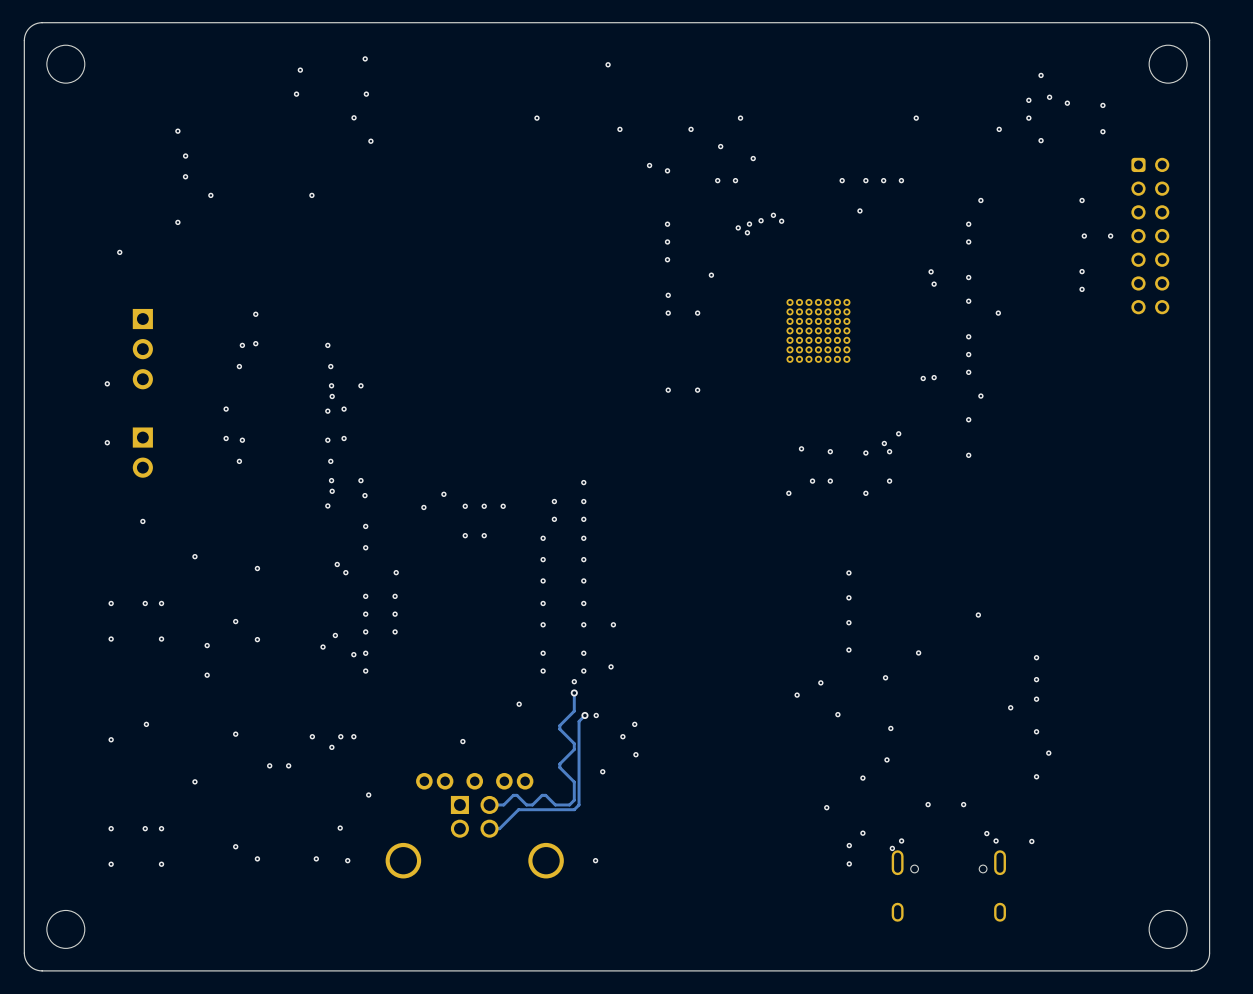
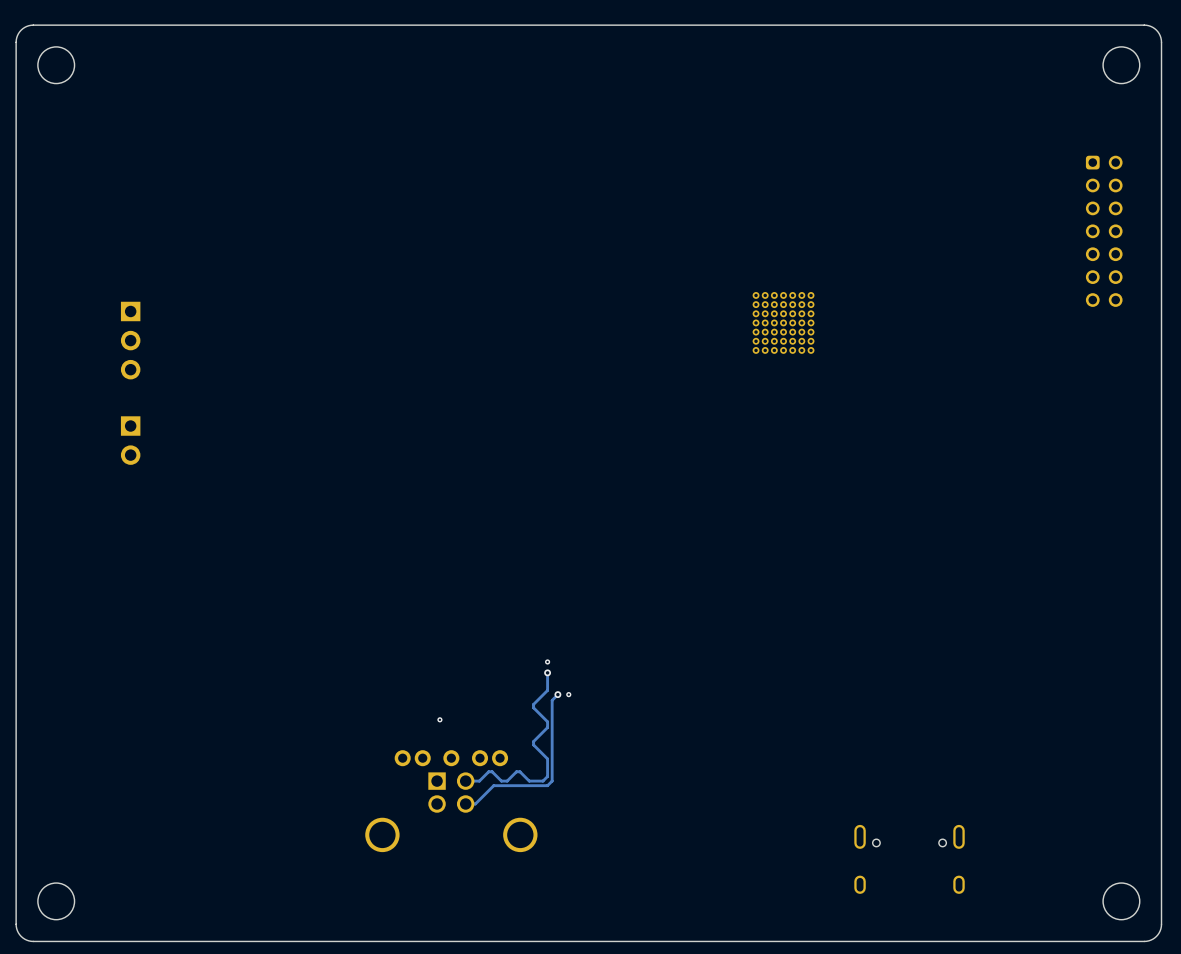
via: (365, 58) -> none
via: (608, 64) -> none
via: (300, 70) -> none
via: (1041, 75) -> none
via: (296, 94) -> none
via: (366, 94) -> none
via: (1049, 97) -> none
via: (1028, 100) -> none
via: (1067, 103) -> none
via: (1102, 105) -> none
via: (354, 117) -> none
via: (536, 118) -> none
via: (740, 118) -> none
via: (916, 118) -> none
via: (1028, 118) -> none
via: (619, 129) -> none
via: (691, 129) -> none
via: (999, 129) -> none
via: (177, 131) -> none
via: (1102, 131) -> none
via: (1041, 140) -> none
via: (370, 141) -> none
via: (720, 146) -> none
via: (185, 156) -> none
via: (753, 158) -> none
via: (649, 165) -> none
via: (667, 170) -> none
via: (185, 176) -> none
via: (717, 180) -> none
via: (735, 180) -> none
via: (842, 180) -> none
via: (865, 180) -> none
via: (883, 180) -> none
via: (901, 180) -> none
via: (210, 195) -> none
via: (311, 195) -> none
via: (980, 200) -> none
via: (1082, 200) -> none
via: (859, 210) -> none
via: (773, 215) -> none
via: (761, 220) -> none
via: (781, 221) -> none
via: (177, 222) -> none
via: (667, 224) -> none
via: (749, 224) -> none
via: (968, 224) -> none
via: (738, 227) -> none
via: (747, 232) -> none
via: (1084, 236) -> none
via: (1110, 236) -> none
via: (667, 241) -> none
via: (968, 241) -> none
via: (119, 252) -> none
via: (667, 259) -> none
via: (931, 271) -> none
via: (1082, 271) -> none
via: (711, 275) -> none
via: (968, 277) -> none
via: (934, 284) -> none
via: (1082, 289) -> none
via: (668, 295) -> none
via: (968, 301) -> none
via: (668, 313) -> none
via: (697, 313) -> none
via: (998, 313) -> none
via: (255, 314) -> none
via: (968, 336) -> none
via: (255, 343) -> none
via: (242, 345) -> none
via: (327, 345) -> none
via: (968, 354) -> none
via: (239, 366) -> none
via: (330, 366) -> none
via: (968, 372) -> none
via: (934, 377) -> none
via: (923, 378) -> none
via: (107, 383) -> none
via: (331, 385) -> none
via: (360, 385) -> none
via: (668, 390) -> none
via: (697, 390) -> none
via: (332, 396) -> none
via: (980, 396) -> none
via: (226, 409) -> none
via: (344, 409) -> none
via: (327, 411) -> none
via: (968, 419) -> none
via: (898, 433) -> none
via: (226, 438) -> none
via: (344, 438) -> none
via: (242, 440) -> none
via: (327, 440) -> none
via: (107, 442) -> none
via: (884, 443) -> none
via: (801, 448) -> none
via: (830, 451) -> none
via: (889, 451) -> none
via: (865, 453) -> none
via: (968, 455) -> none
via: (239, 461) -> none
via: (330, 461) -> none
via: (331, 480) -> none
via: (360, 480) -> none
via: (812, 481) -> none
via: (830, 481) -> none
via: (889, 481) -> none
via: (583, 482) -> none
via: (332, 491) -> none
via: (788, 493) -> none
via: (865, 493) -> none
via: (443, 494) -> none
via: (364, 495) -> none
via: (554, 501) -> none
via: (583, 501) -> none
via: (327, 505) -> none
via: (465, 506) -> none
via: (484, 506) -> none
via: (503, 506) -> none
via: (423, 507) -> none
via: (554, 519) -> none
via: (583, 519) -> none
via: (142, 521) -> none
via: (365, 526) -> none
via: (465, 535) -> none
via: (484, 535) -> none
via: (543, 538) -> none
via: (583, 538) -> none
via: (365, 547) -> none
via: (194, 556) -> none
via: (543, 559) -> none
via: (583, 559) -> none
via: (337, 564) -> none
via: (257, 568) -> none
via: (345, 572) -> none
via: (396, 572) -> none
via: (848, 572) -> none
via: (543, 580) -> none
via: (583, 580) -> none
via: (365, 596) -> none
via: (395, 596) -> none
via: (848, 597) -> none
via: (111, 603) -> none
via: (145, 603) -> none
via: (161, 603) -> none
via: (543, 603) -> none
via: (583, 603) -> none
via: (365, 614) -> none
via: (395, 614) -> none
via: (978, 615) -> none
via: (235, 621) -> none
via: (848, 622) -> none
via: (543, 624) -> none
via: (583, 624) -> none
via: (613, 624) -> none
via: (365, 631) -> none
via: (395, 631) -> none
via: (335, 635) -> none
via: (111, 639) -> none
via: (161, 639) -> none
via: (257, 639) -> none
via: (207, 645) -> none
via: (323, 647) -> none
via: (848, 650) -> none
via: (918, 652) -> none
via: (365, 653) -> none
via: (543, 653) -> none
via: (583, 653) -> none
via: (353, 654) -> none
via: (1036, 657) -> none
via: (611, 666) -> none
via: (365, 671) -> none
via: (543, 671) -> none
via: (583, 671) -> none
via: (207, 675) -> none
via: (885, 677) -> none
via: (1036, 679) -> none
via: (820, 682) -> none
via: (797, 695) -> none
via: (1036, 699) -> none
via: (519, 704) -> none
via: (1010, 707) -> none
via: (837, 714) -> none
via: (146, 724) -> none
via: (634, 724) -> none
via: (890, 728) -> none
via: (1036, 731) -> none
via: (235, 734) -> none
via: (312, 736) -> none
via: (340, 736) -> none
via: (353, 736) -> none
via: (622, 736) -> none
via: (111, 739) -> none
via: (331, 747) -> none
via: (1048, 753) -> none
via: (635, 754) -> none
via: (886, 759) -> none
via: (269, 765) -> none
via: (288, 765) -> none
via: (602, 771) -> none
via: (1036, 776) -> none
via: (862, 778) -> none
via: (194, 781) -> none
via: (368, 795) -> none
via: (928, 804) -> none
via: (963, 804) -> none
via: (826, 807) -> none
via: (111, 828) -> none
via: (145, 828) -> none
via: (161, 828) -> none
via: (340, 828) -> none
via: (862, 833) -> none
via: (986, 833) -> none
via: (901, 840) -> none
via: (996, 840) -> none
via: (1031, 841) -> none
via: (849, 845) -> none
via: (235, 846) -> none
via: (892, 848) -> none
via: (257, 858) -> none
via: (316, 858) -> none
via: (347, 860) -> none
via: (595, 860) -> none
via: (849, 863) -> none
via: (111, 864) -> none
via: (161, 864) -> none

